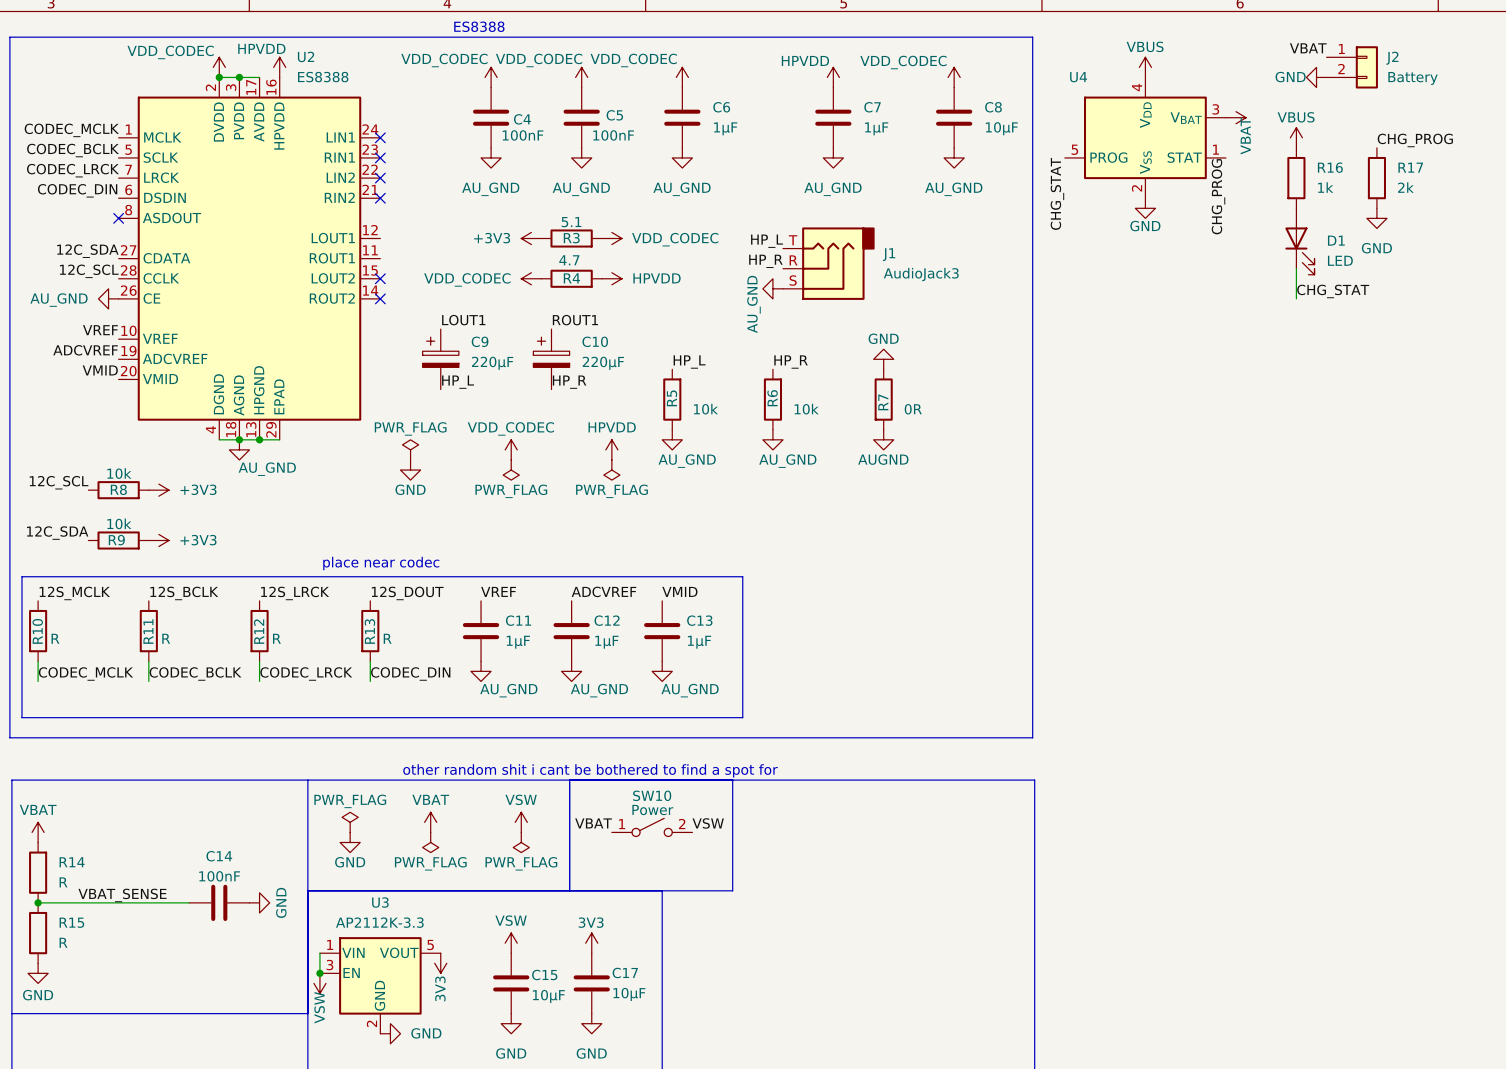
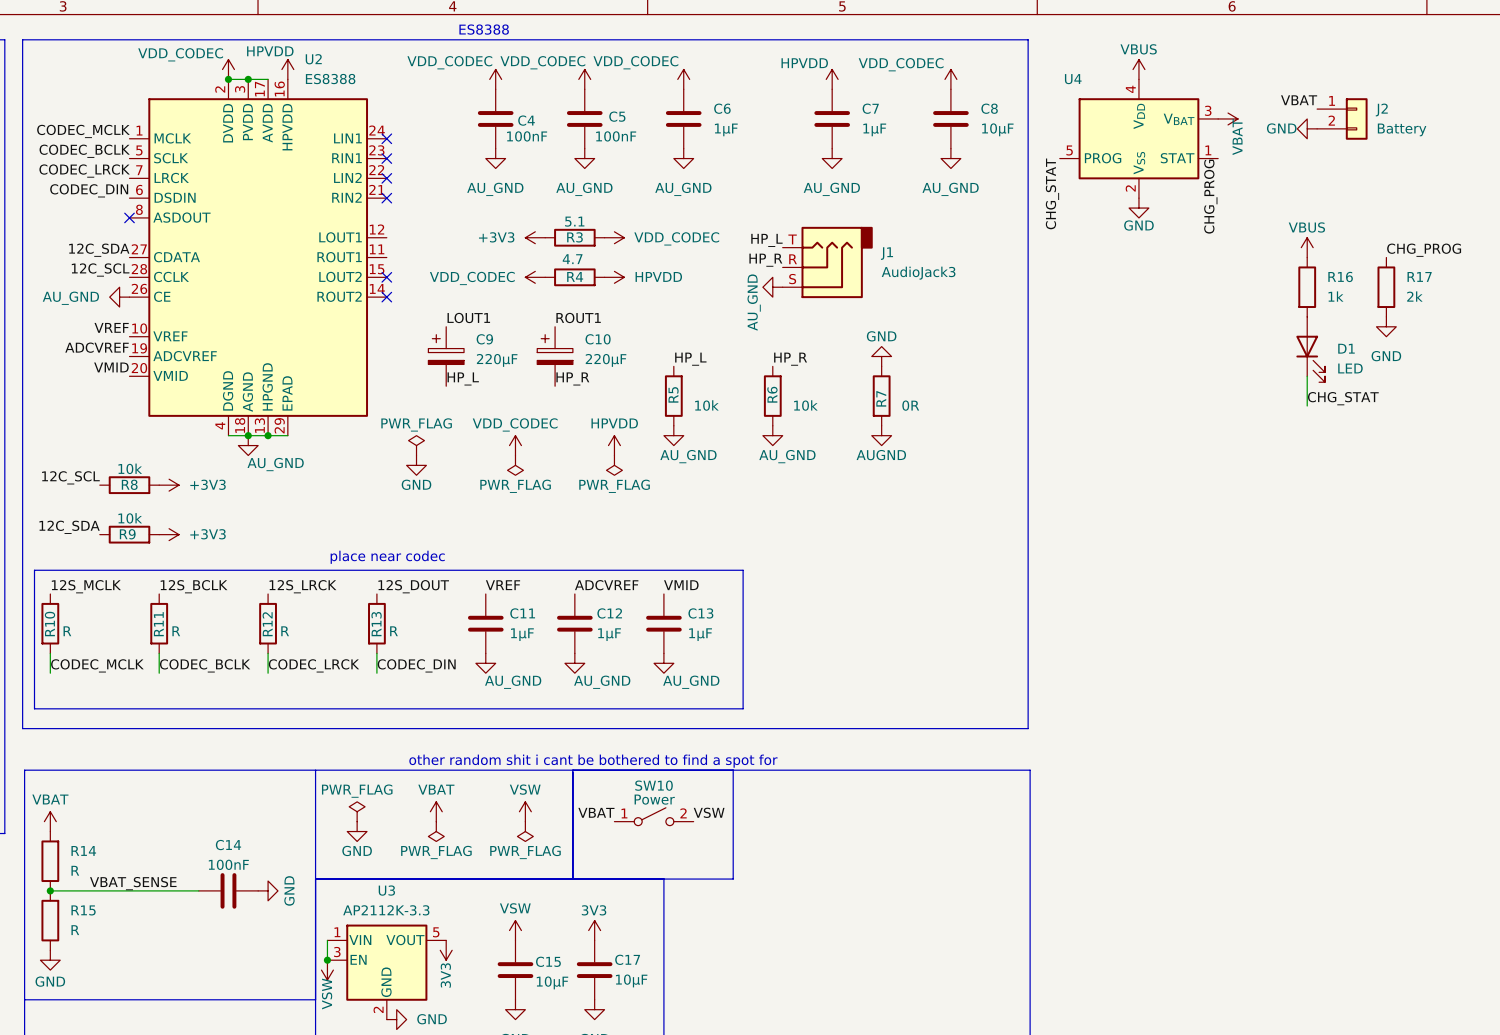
label position: VBAT (1308, 48) -> VBAT (1299, 100)
J2 position: (1352, 67) -> (1342, 118)
power symbol position: GND (1316, 77) -> GND (1307, 128)
power symbol position: VBUS (1296, 137) -> VBUS (1307, 247)
label position: CHG_PROG (1415, 140) -> CHG_PROG (1424, 250)
R16 position: (1296, 178) -> (1307, 287)
R17 position: (1376, 178) -> (1386, 287)
power symbol: GND (1376, 218) -> none
D1 position: (1299, 241) -> (1310, 349)
wire: (1296, 268) (1296, 298) -> (1307, 376) (1307, 405)
label position: CHG_STAT (1333, 291) -> CHG_STAT (1343, 398)
power symbol: none -> GND (1386, 326)

